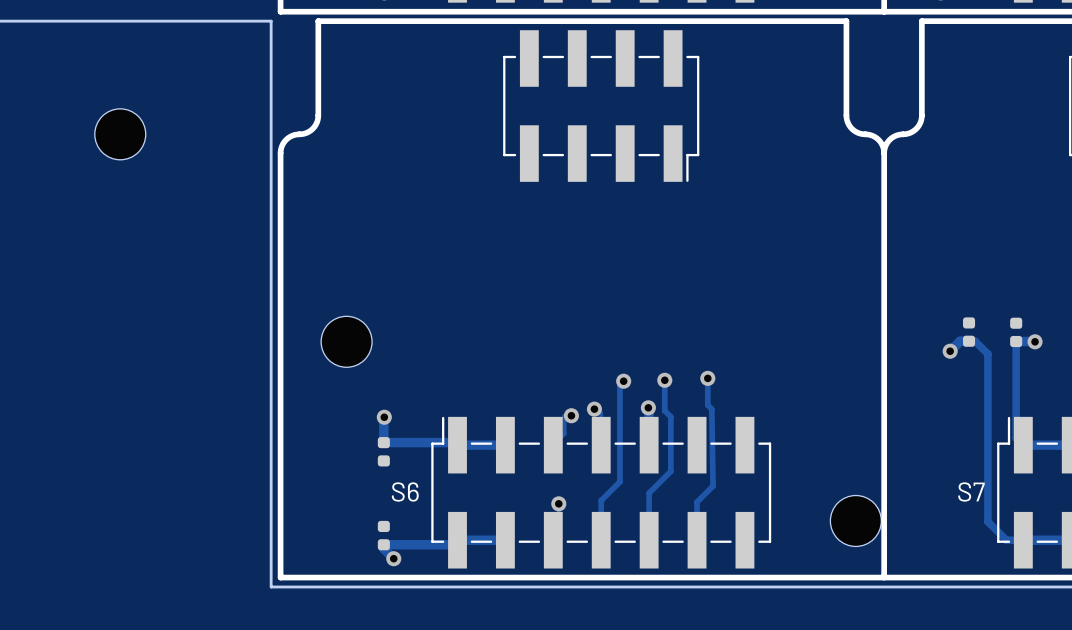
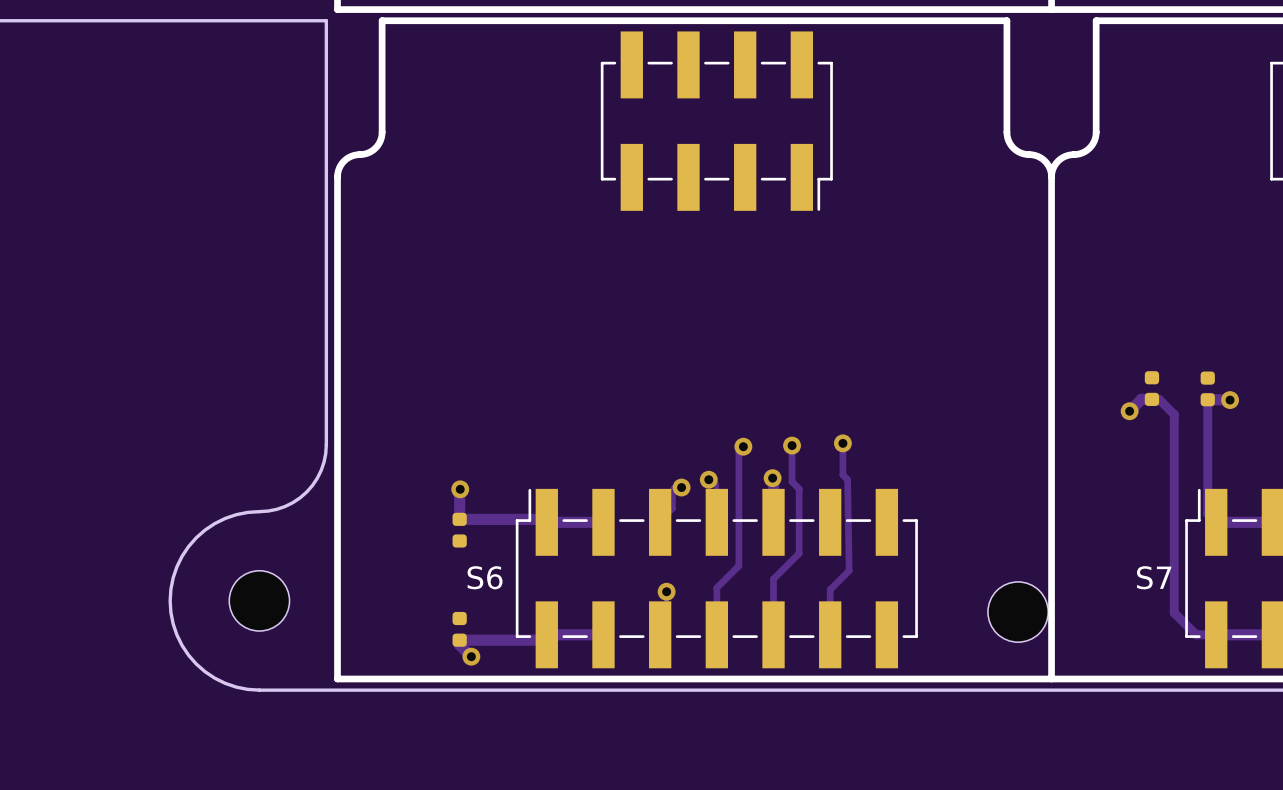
part: (120, 134) -> none
part: (346, 341) -> none
board edge: (271, 379) (271, 587) -> (326, 444) (321, 470) (312, 485) (300, 497) (276, 509) (247, 512) (225, 518) (214, 523) (196, 537) (188, 546) (176, 566) (173, 577) (170, 600) (173, 623) (182, 645) (196, 664) (214, 678) (225, 683) (247, 689) (326, 690)
part: none -> (259, 600)

